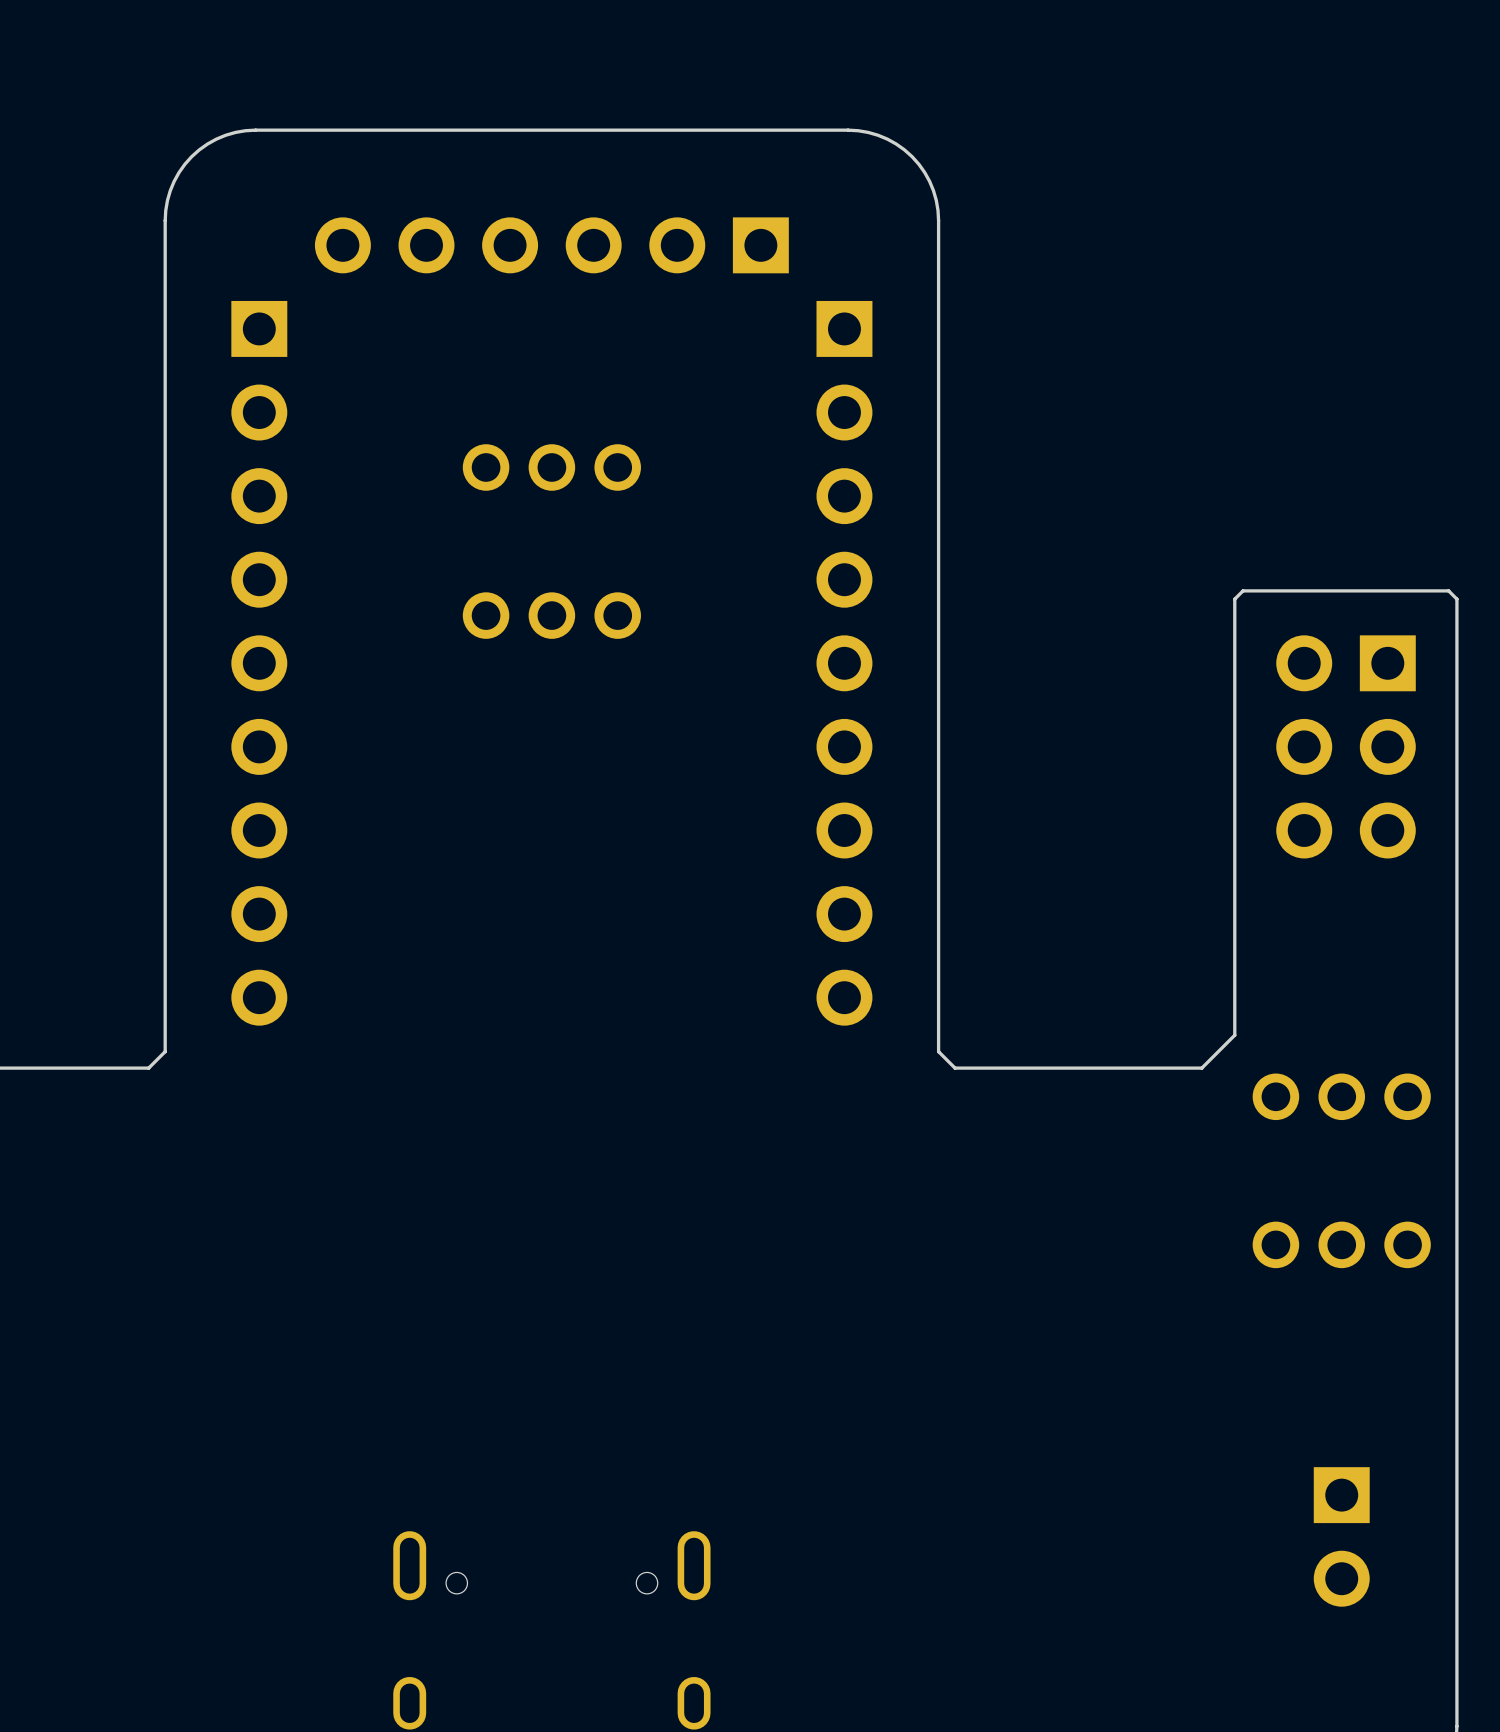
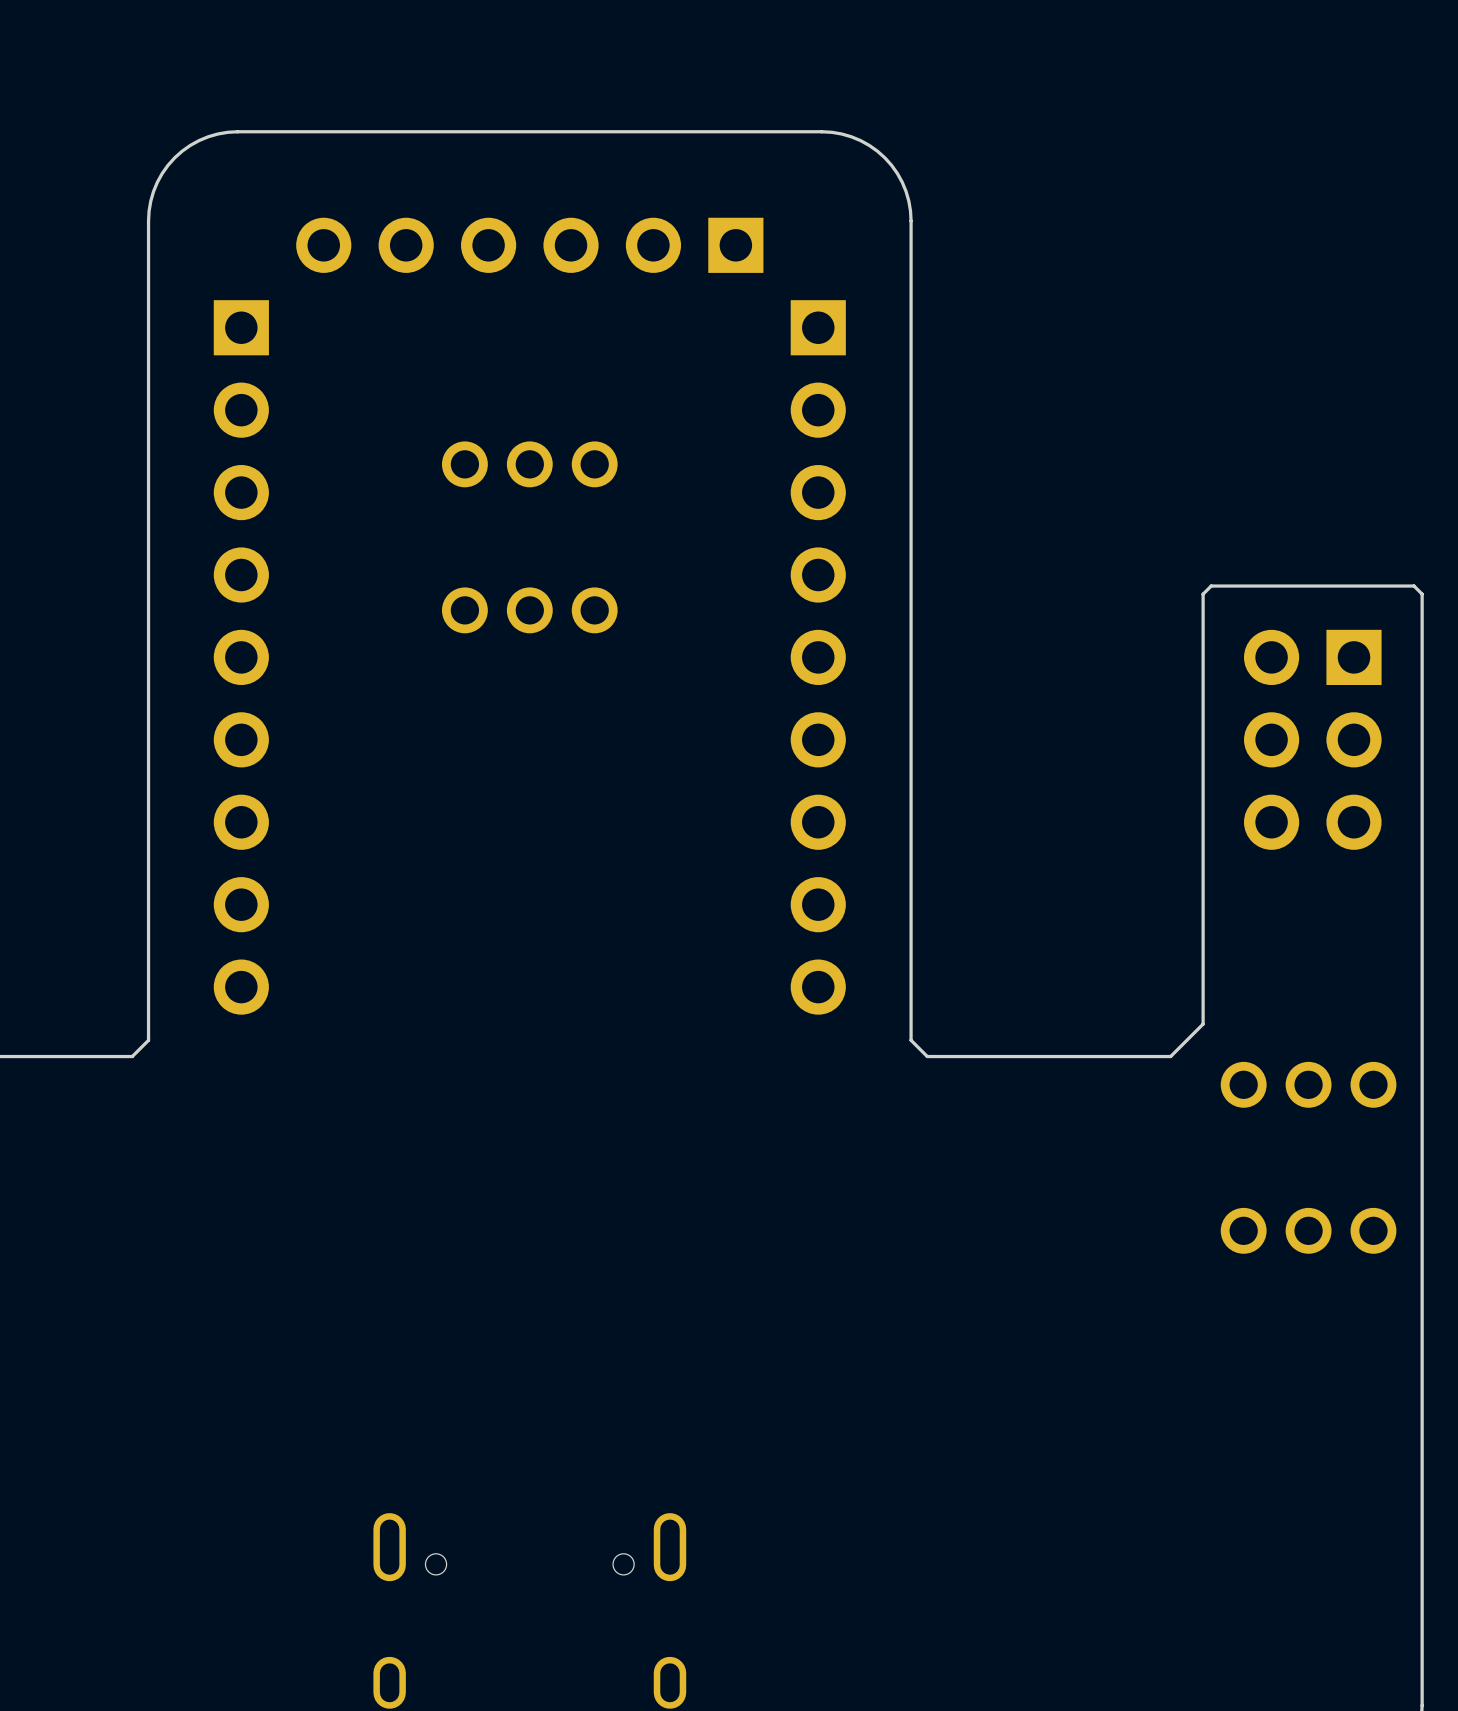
part: (1341, 1536) -> none

